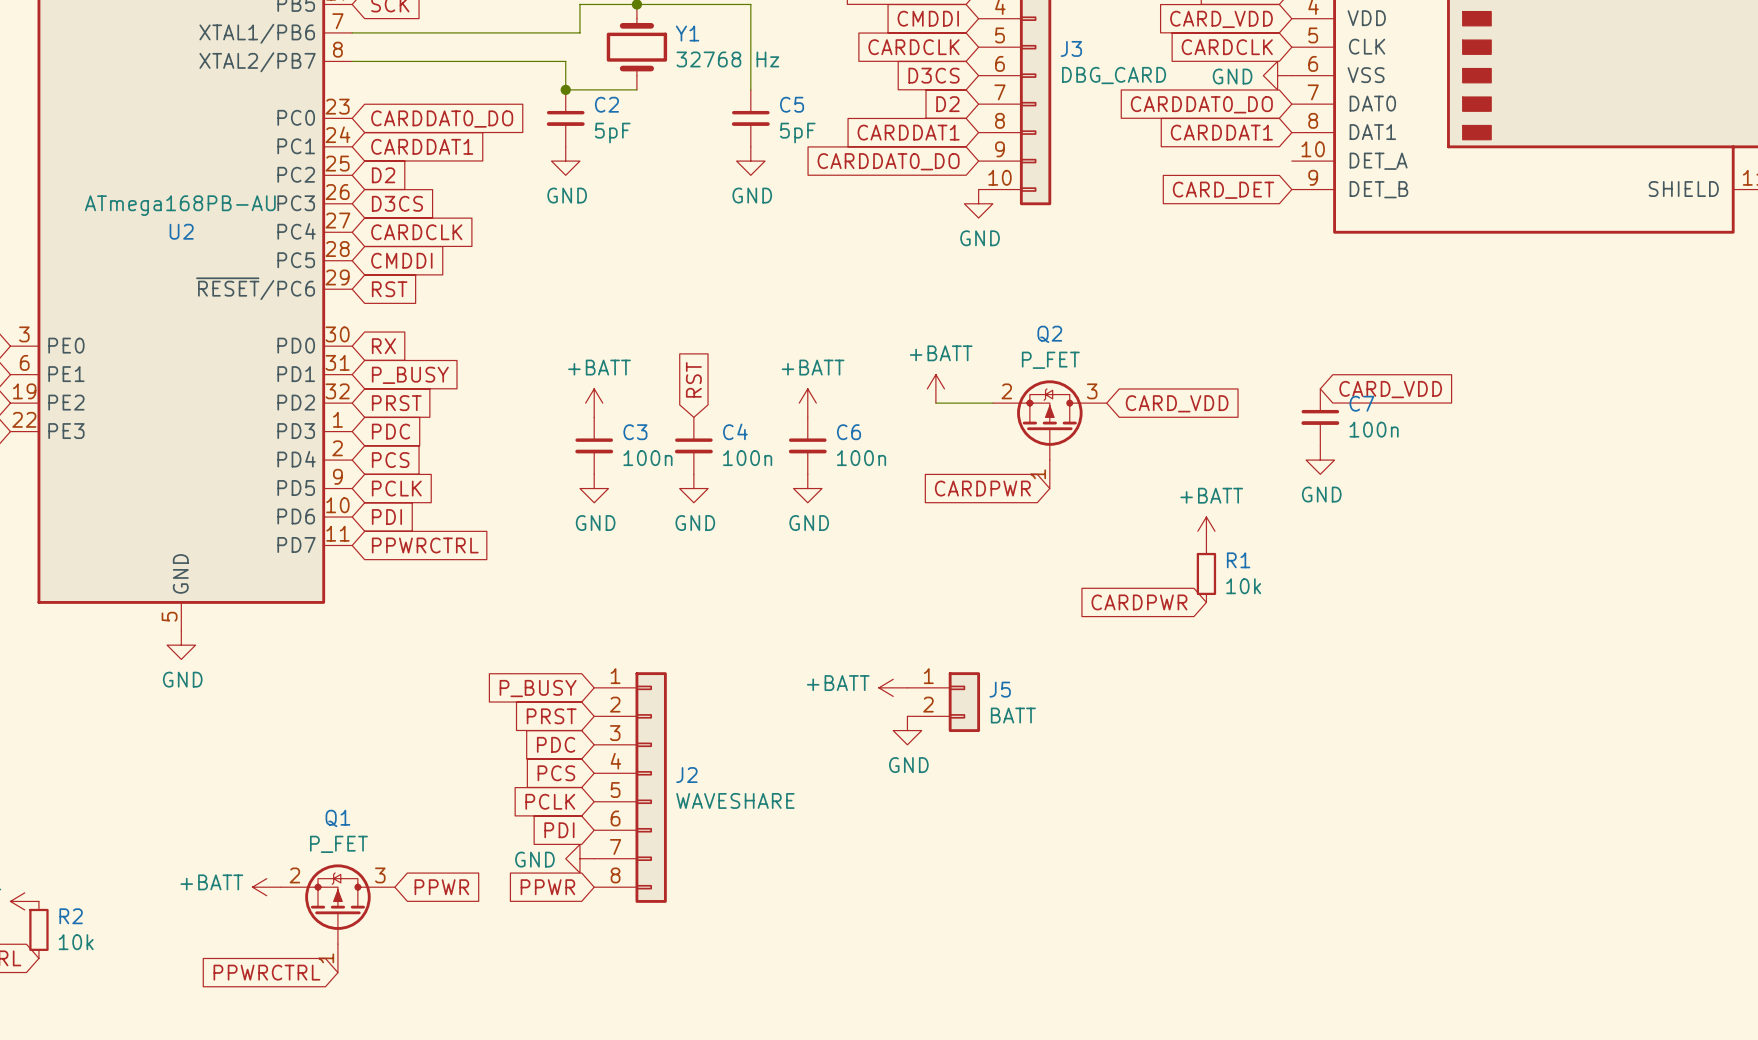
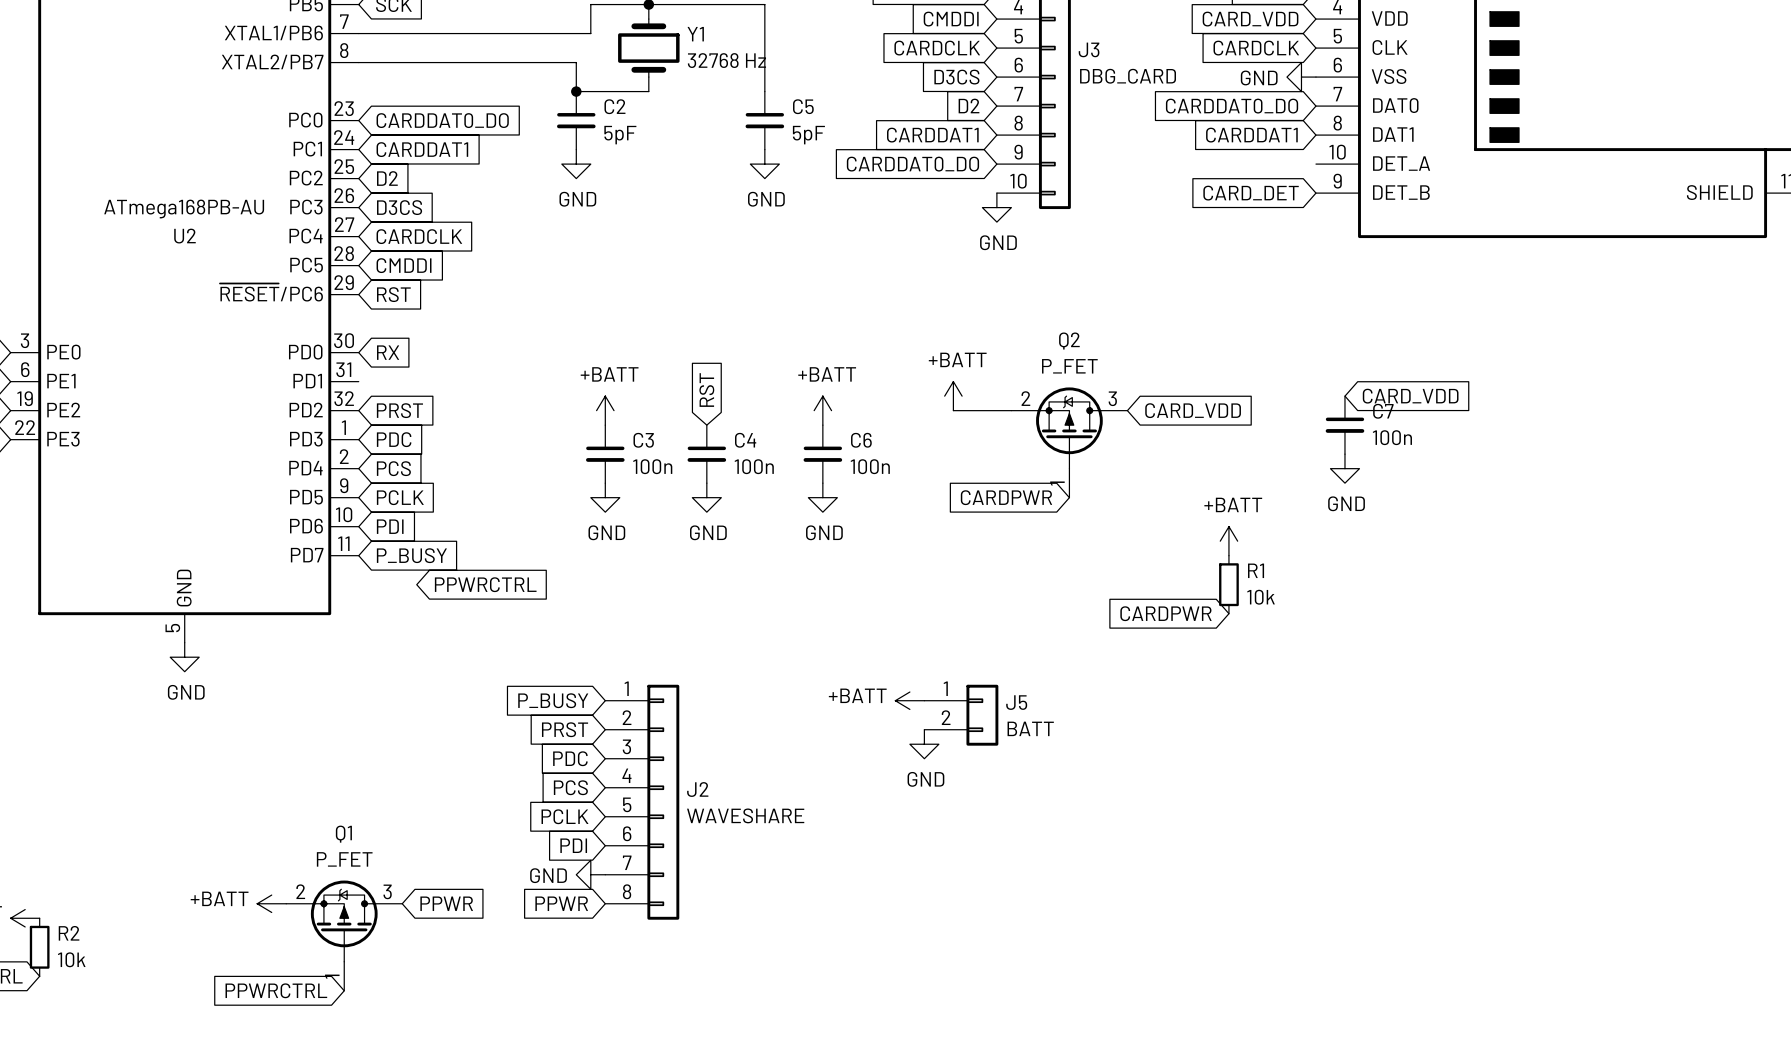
global label: P_BUSY (410, 375) -> none
global label: PPWRCTRL (425, 545) -> P_BUSY (411, 555)
global label: none -> PPWRCTRL (485, 584)

